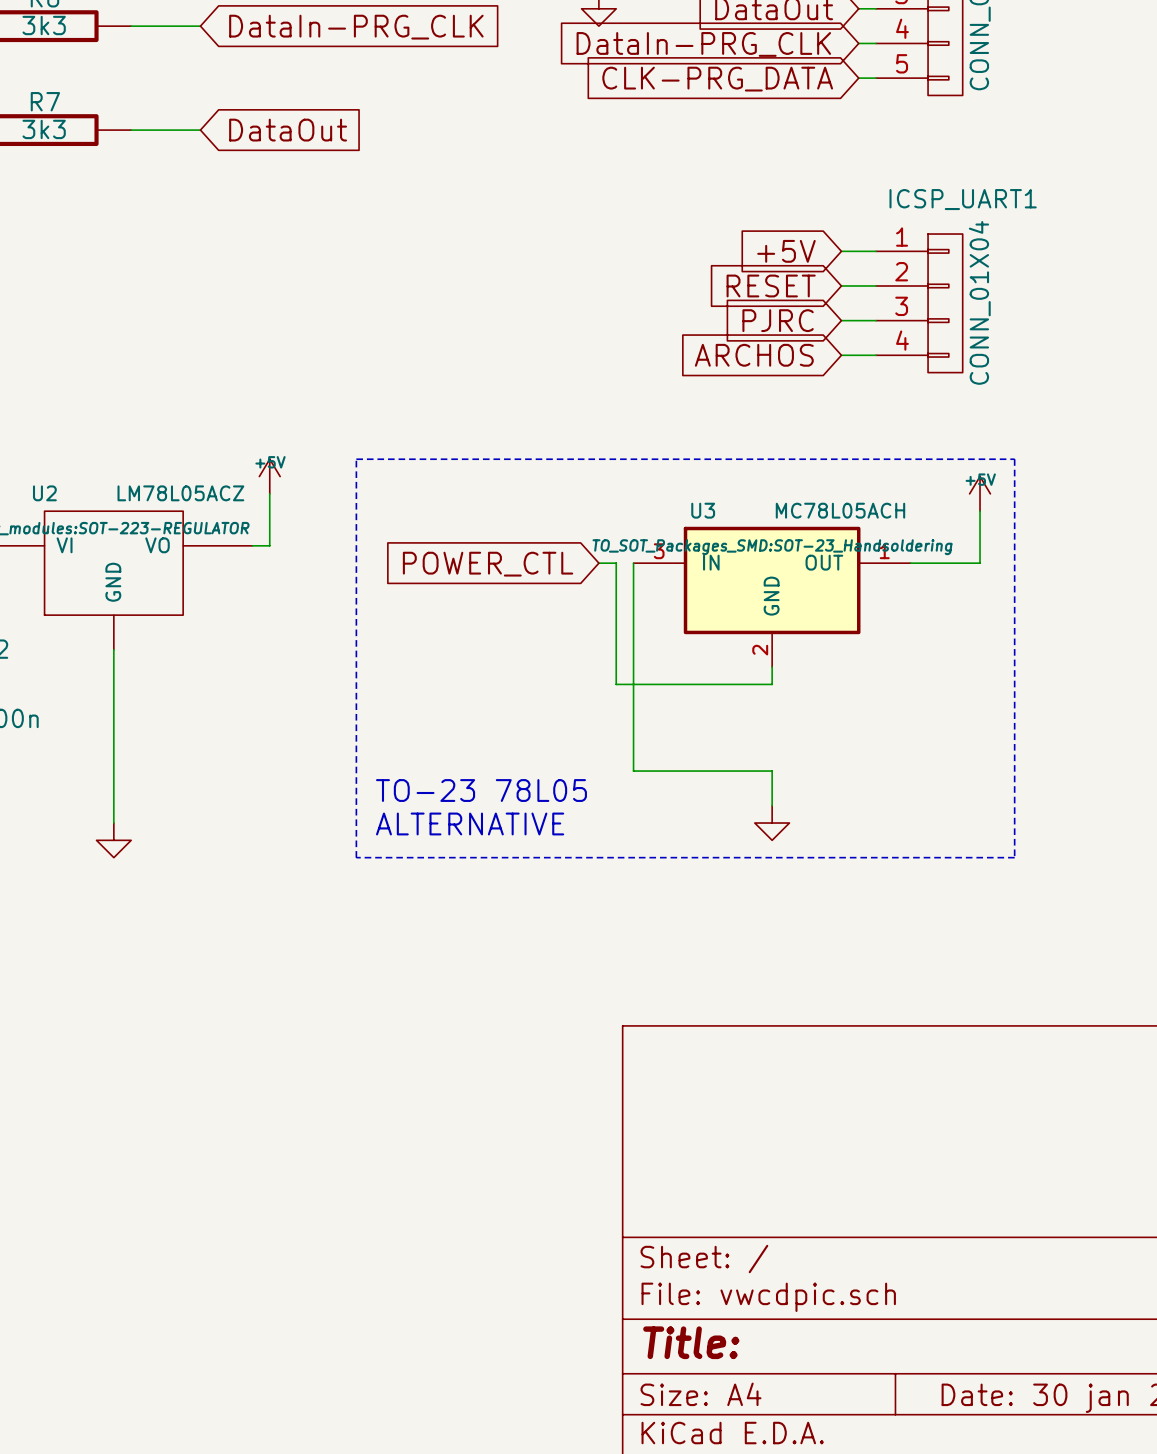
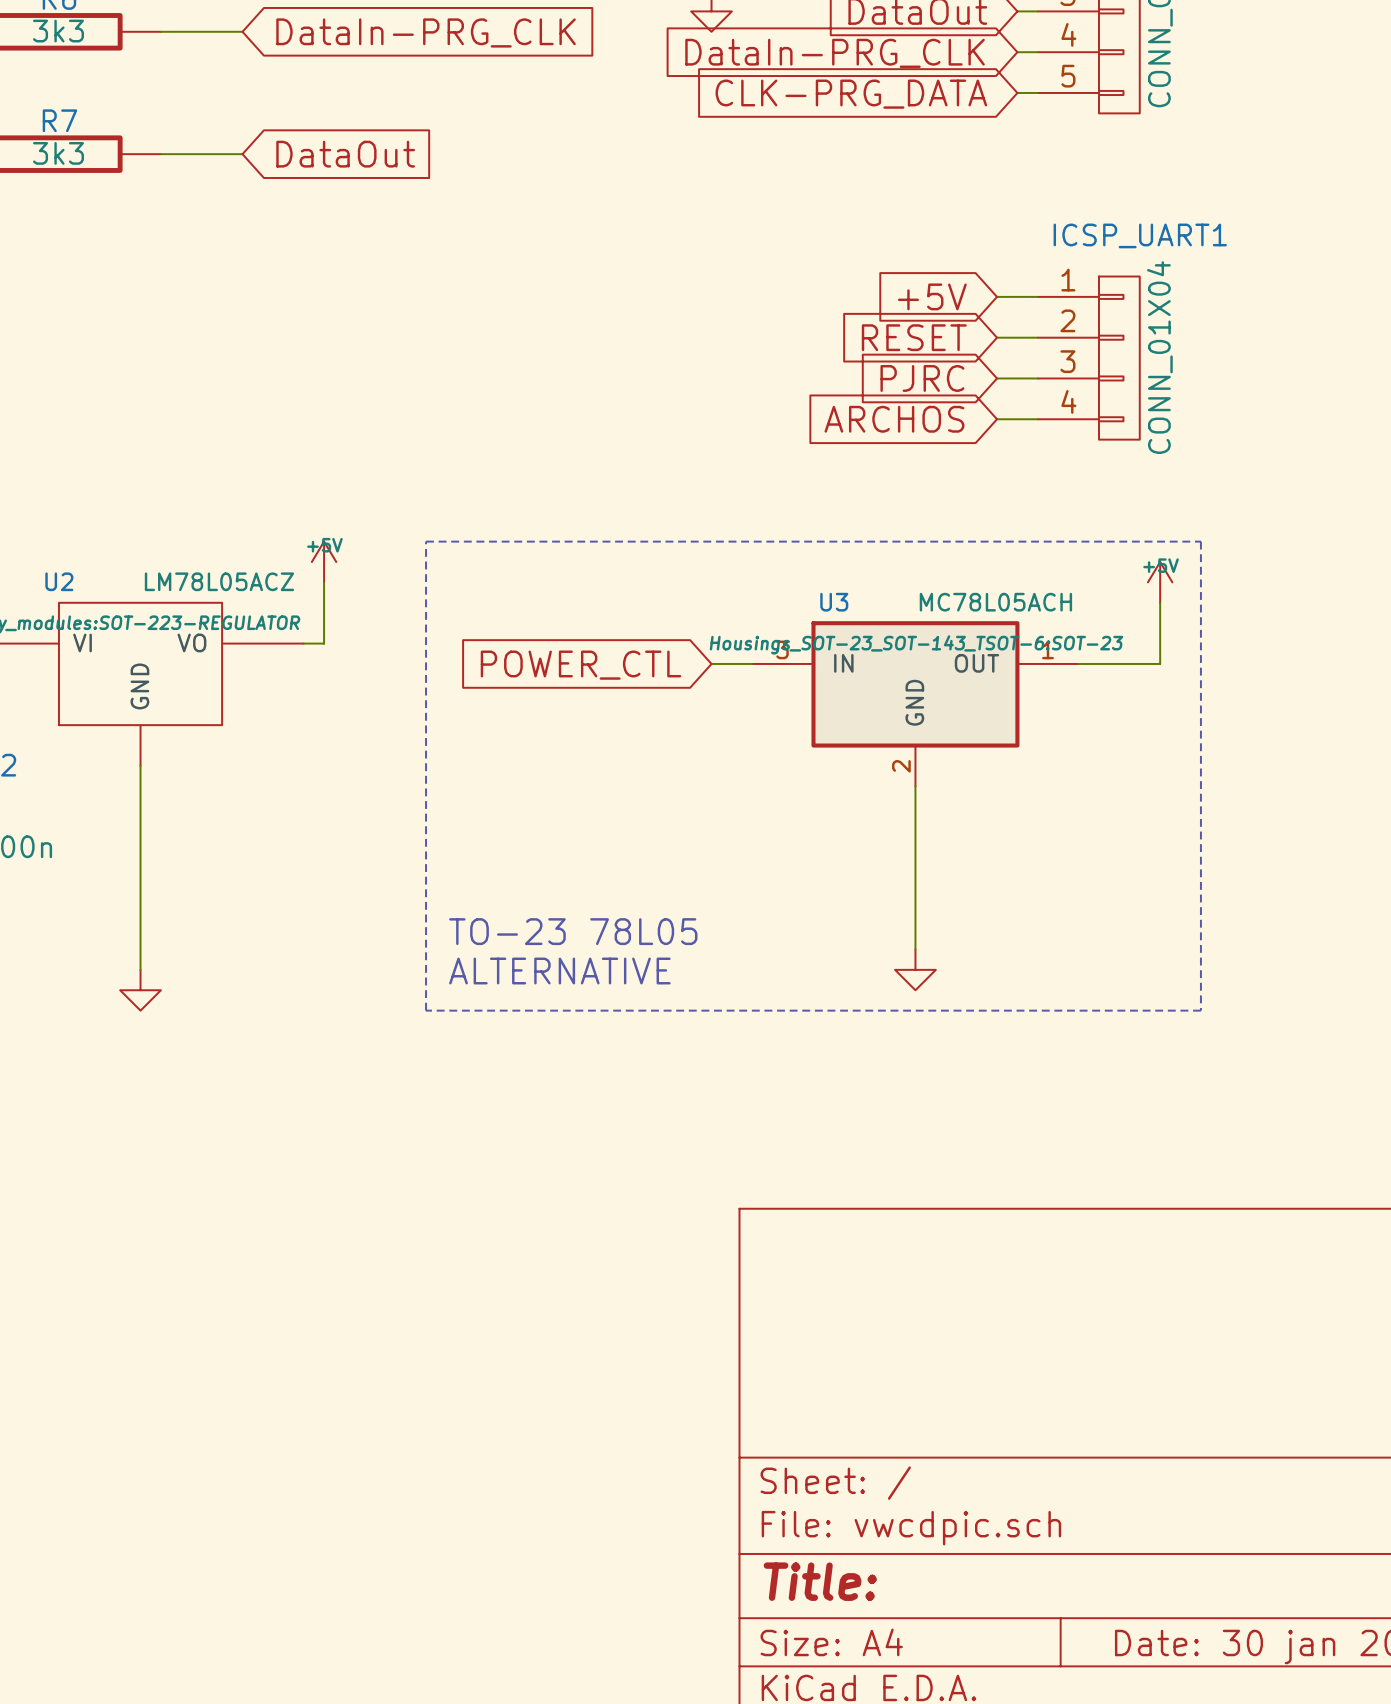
U3 text: TO_SOT_Packages_SMD:SOT-23_Handsoldering (772, 547) -> Housings_SOT-23_SOT-143_TSOT-6:SOT-23 (916, 644)
wire: (616, 563) (616, 684) (772, 684) -> (731, 663) (752, 663)
wire: (633, 563) (633, 771) (772, 771) -> (915, 806) (915, 908)

